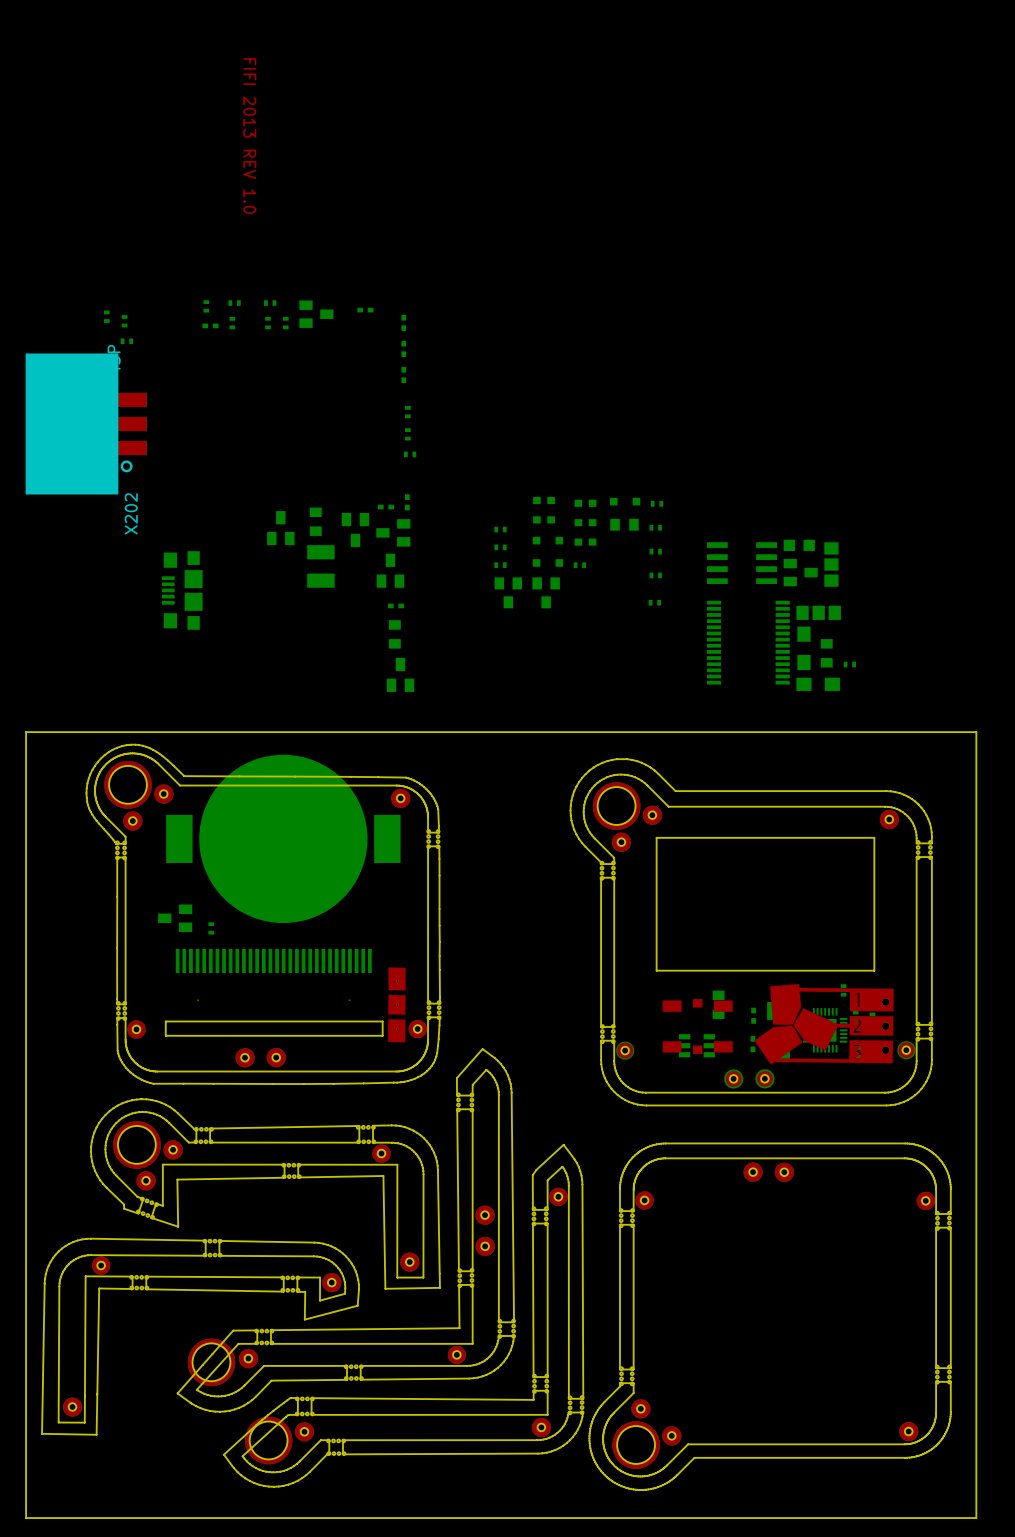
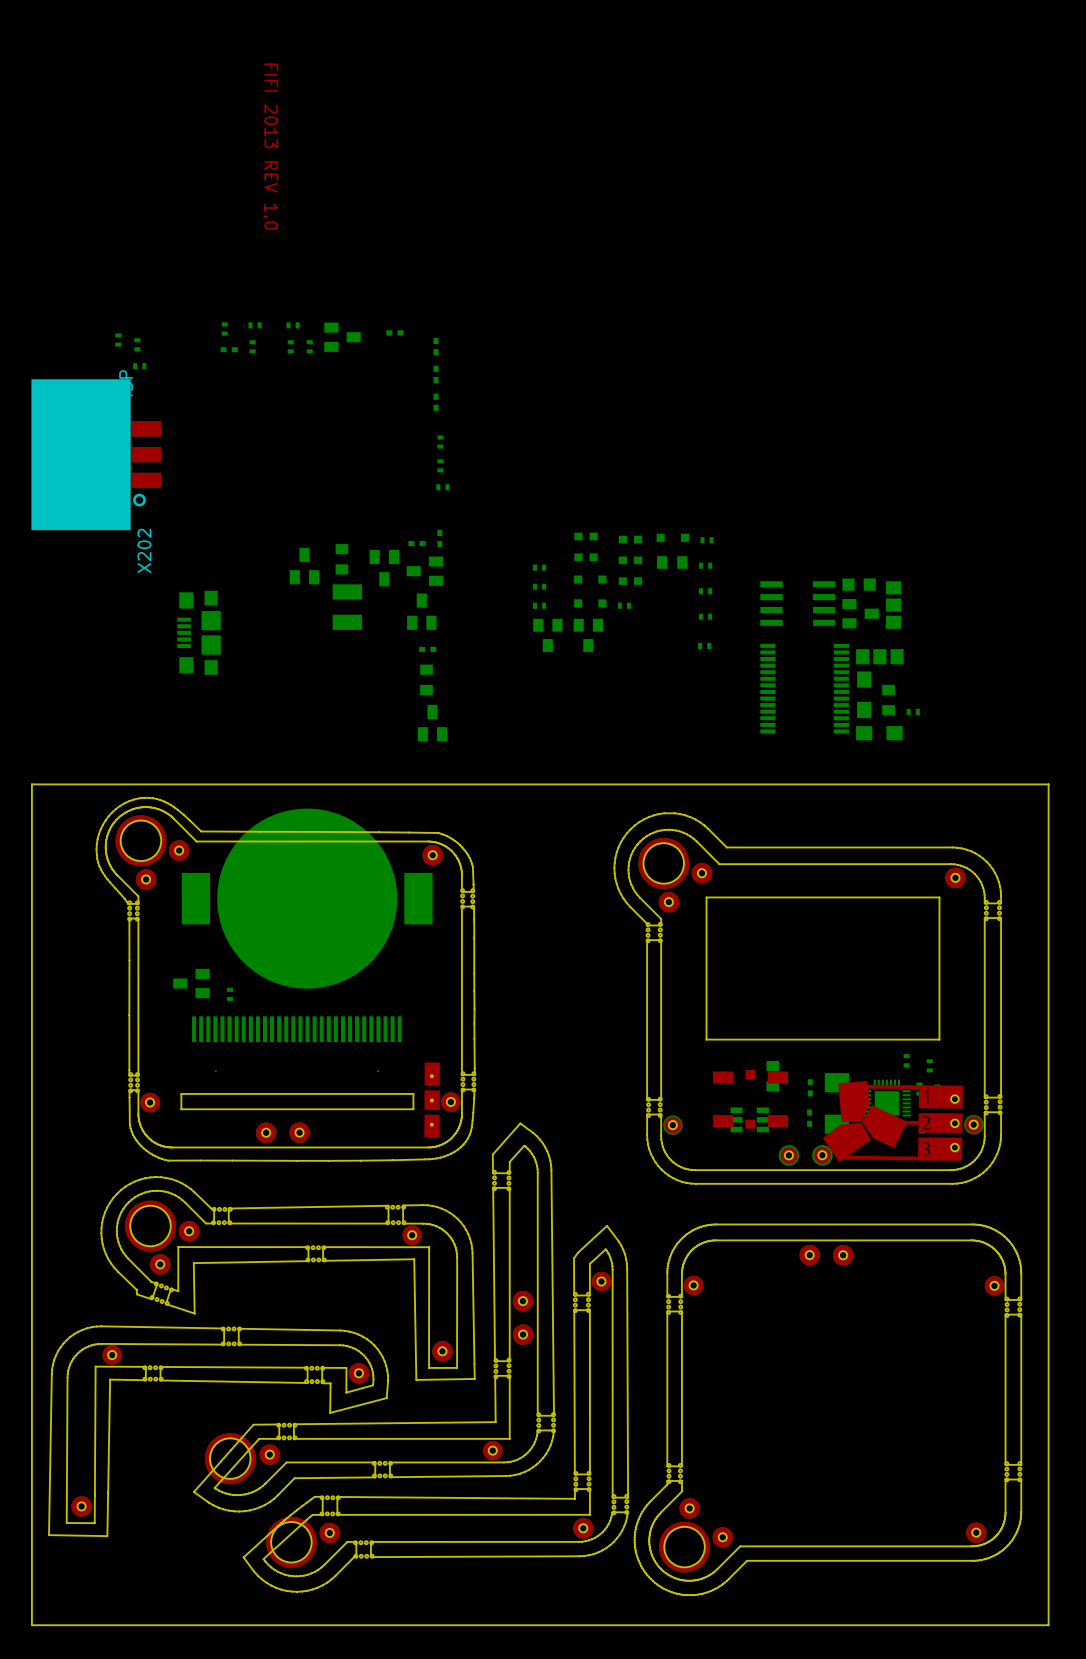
part: (396, 1004) -> none
part: (824, 1024) -> none
part: none -> (432, 1100)
part: none -> (892, 1121)

